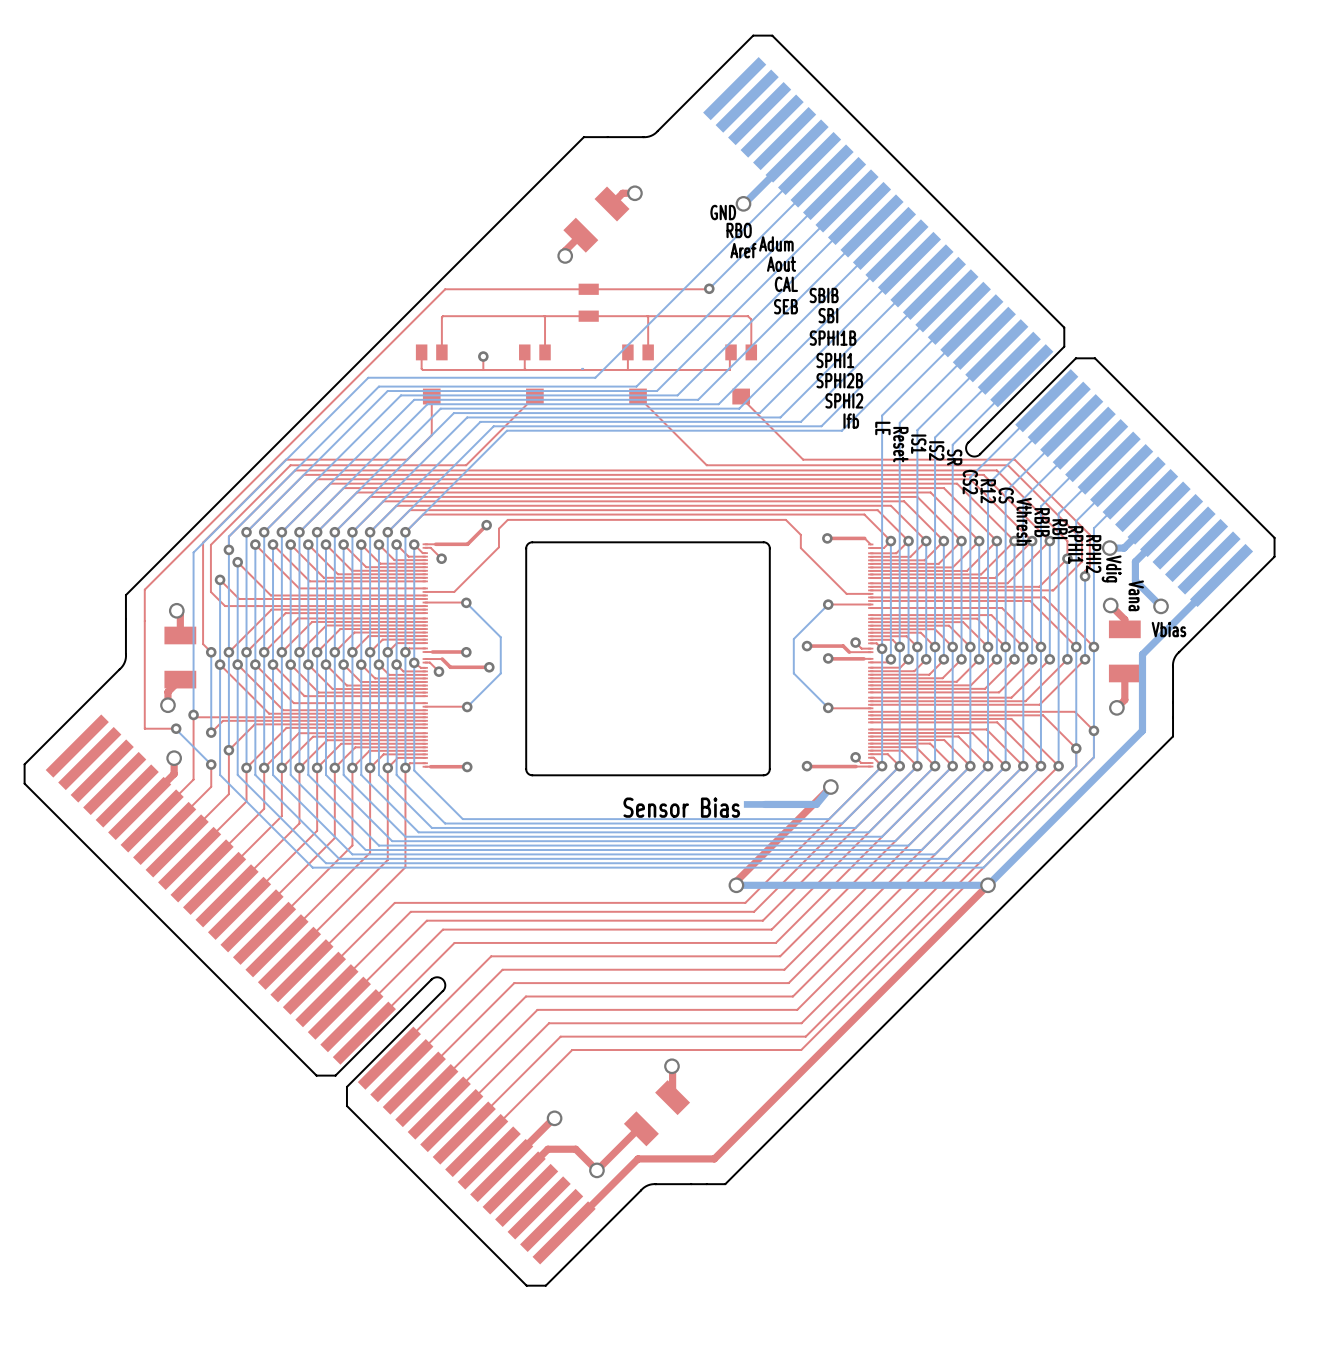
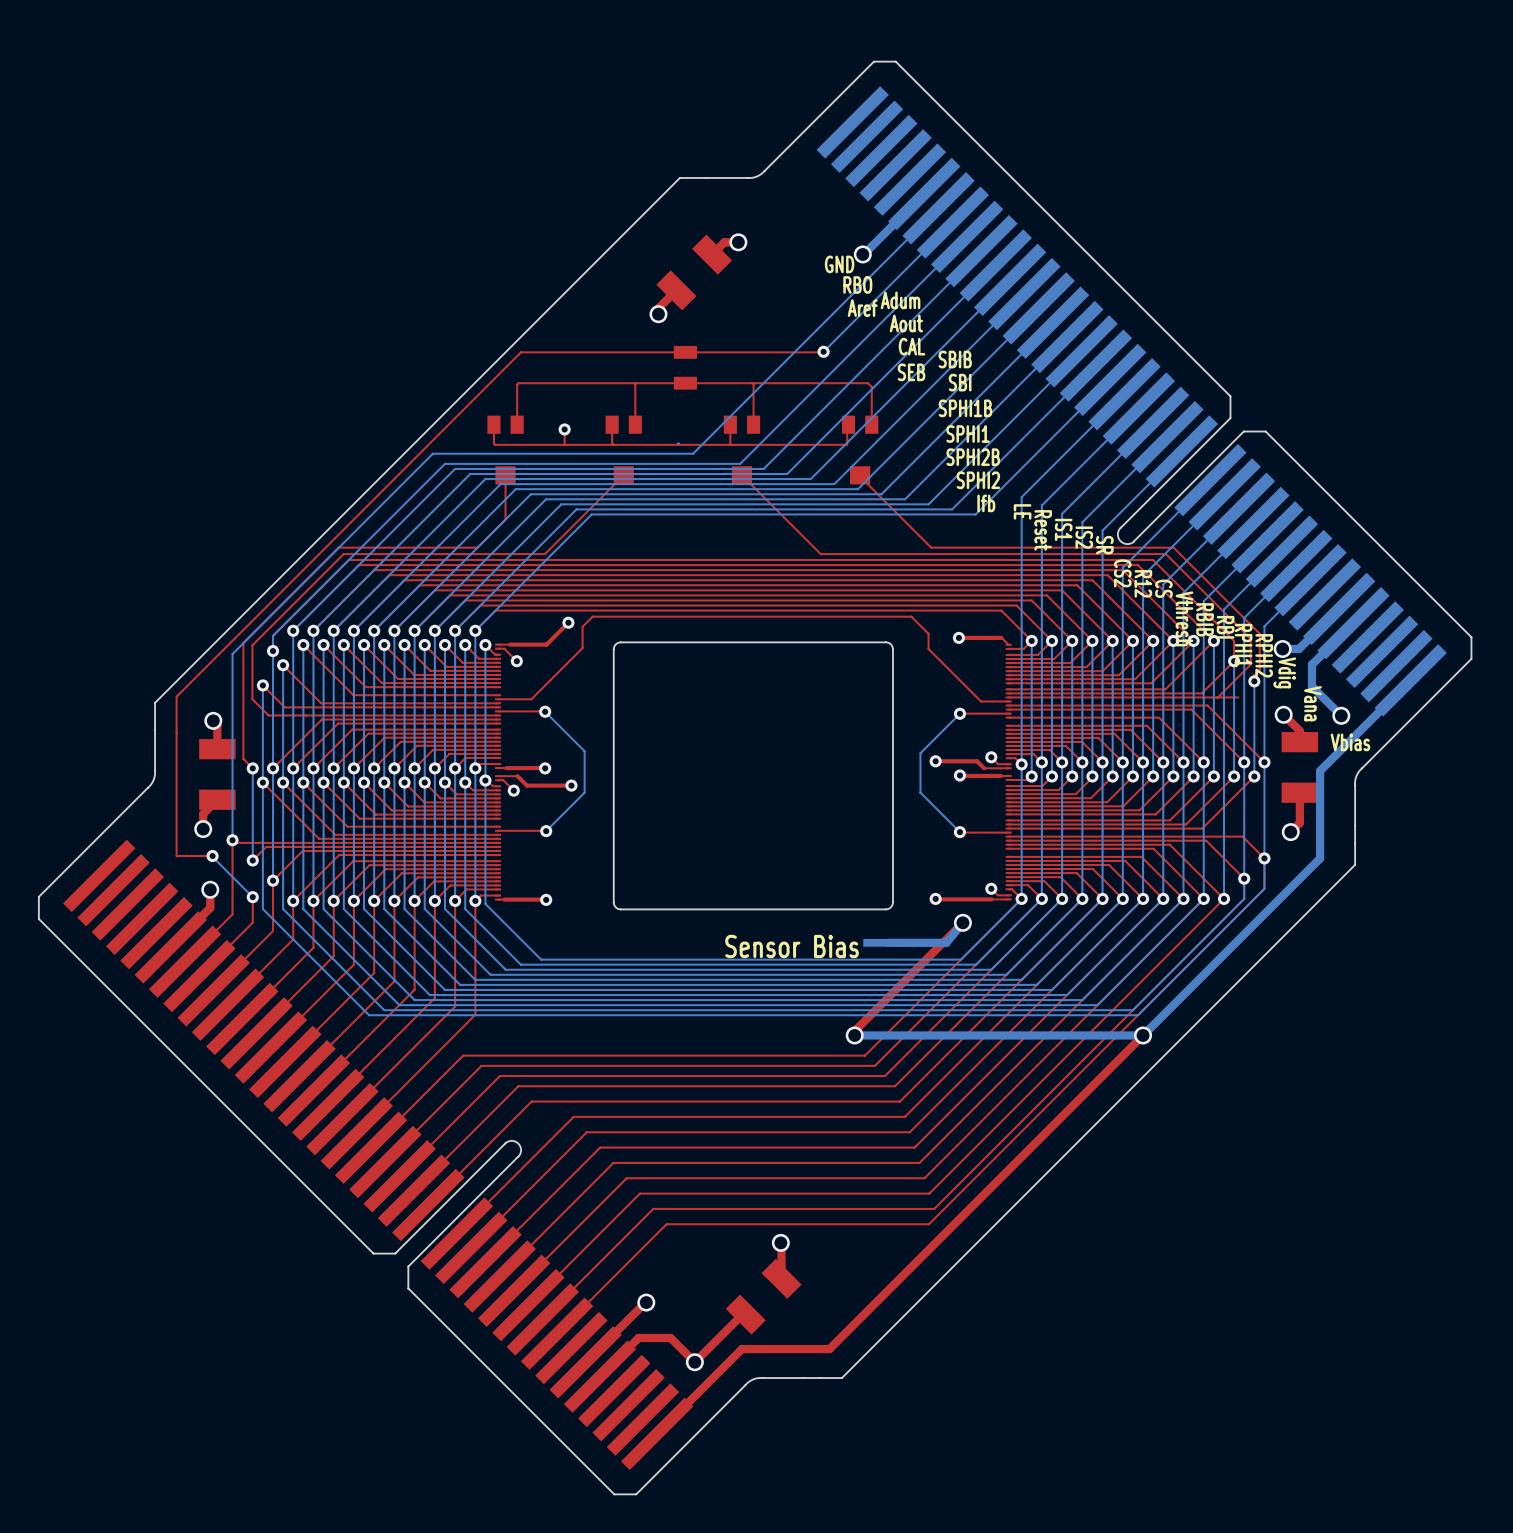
top track: none -> (1238, 697) (1217, 697)

